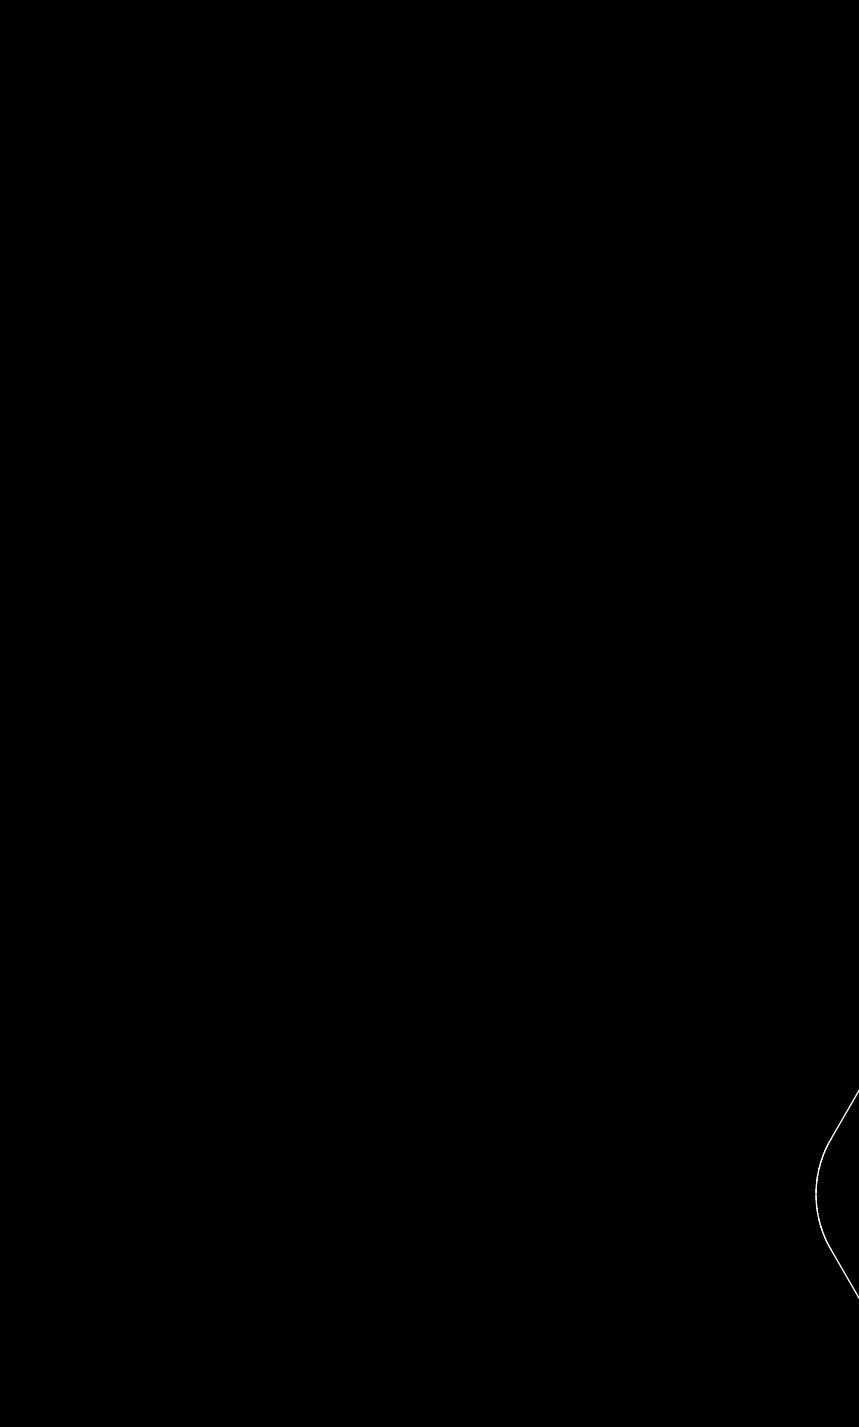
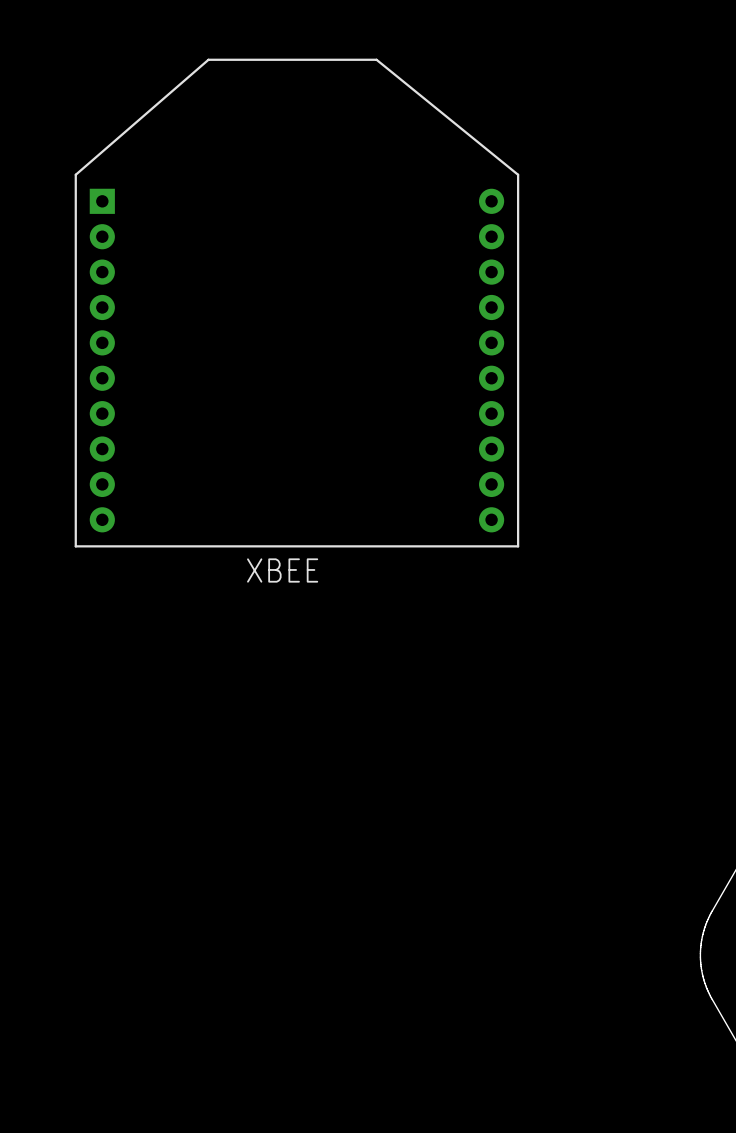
XBEE: none -> (296, 303)

